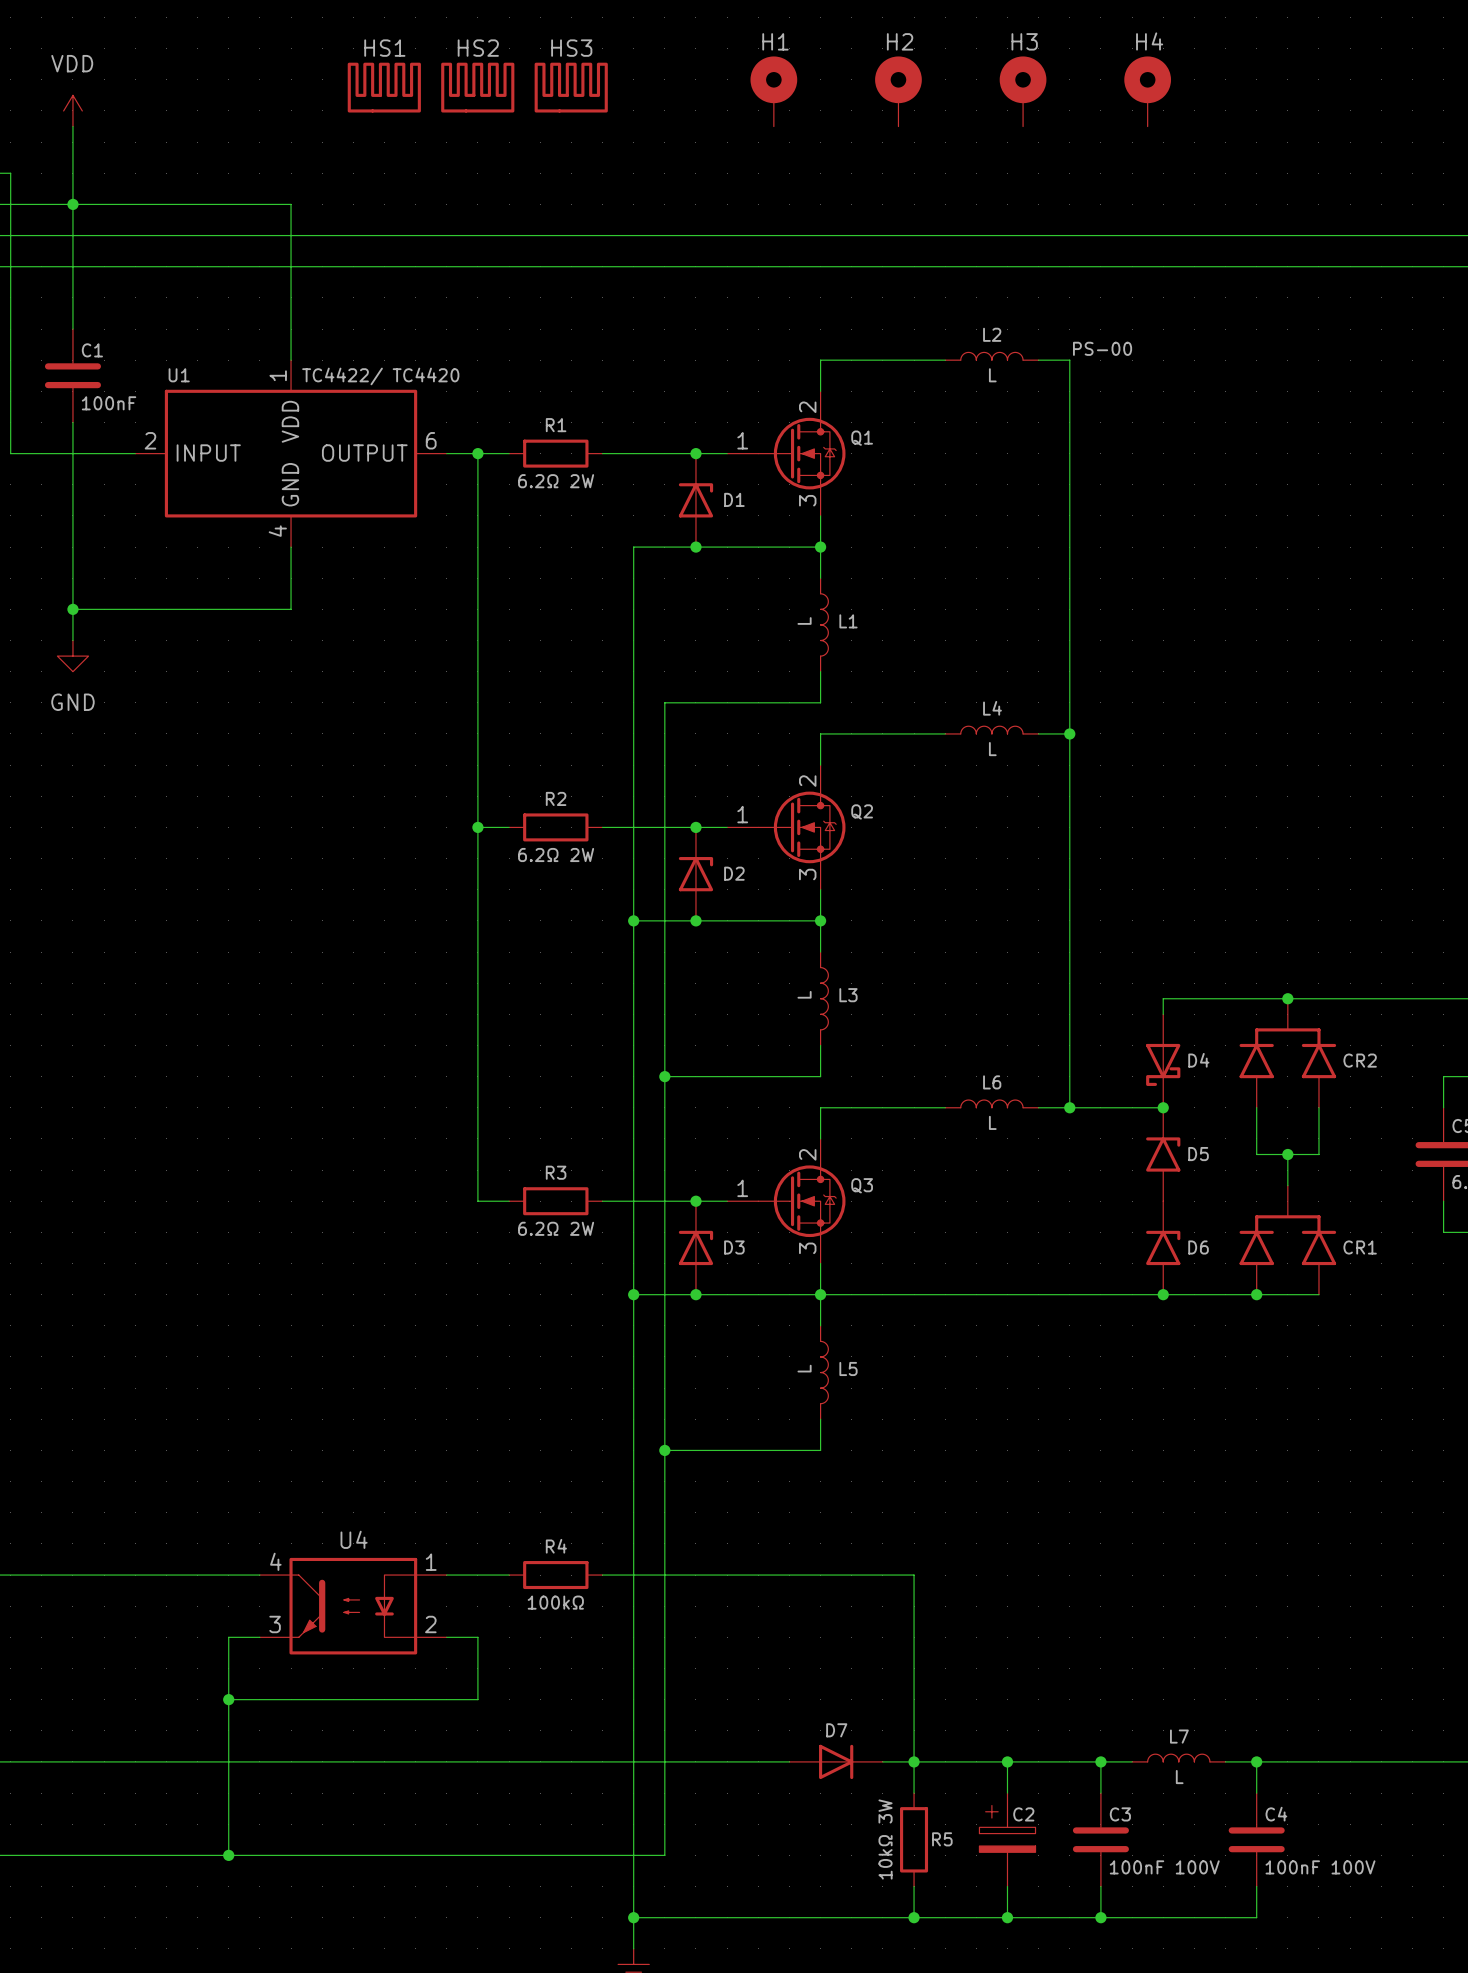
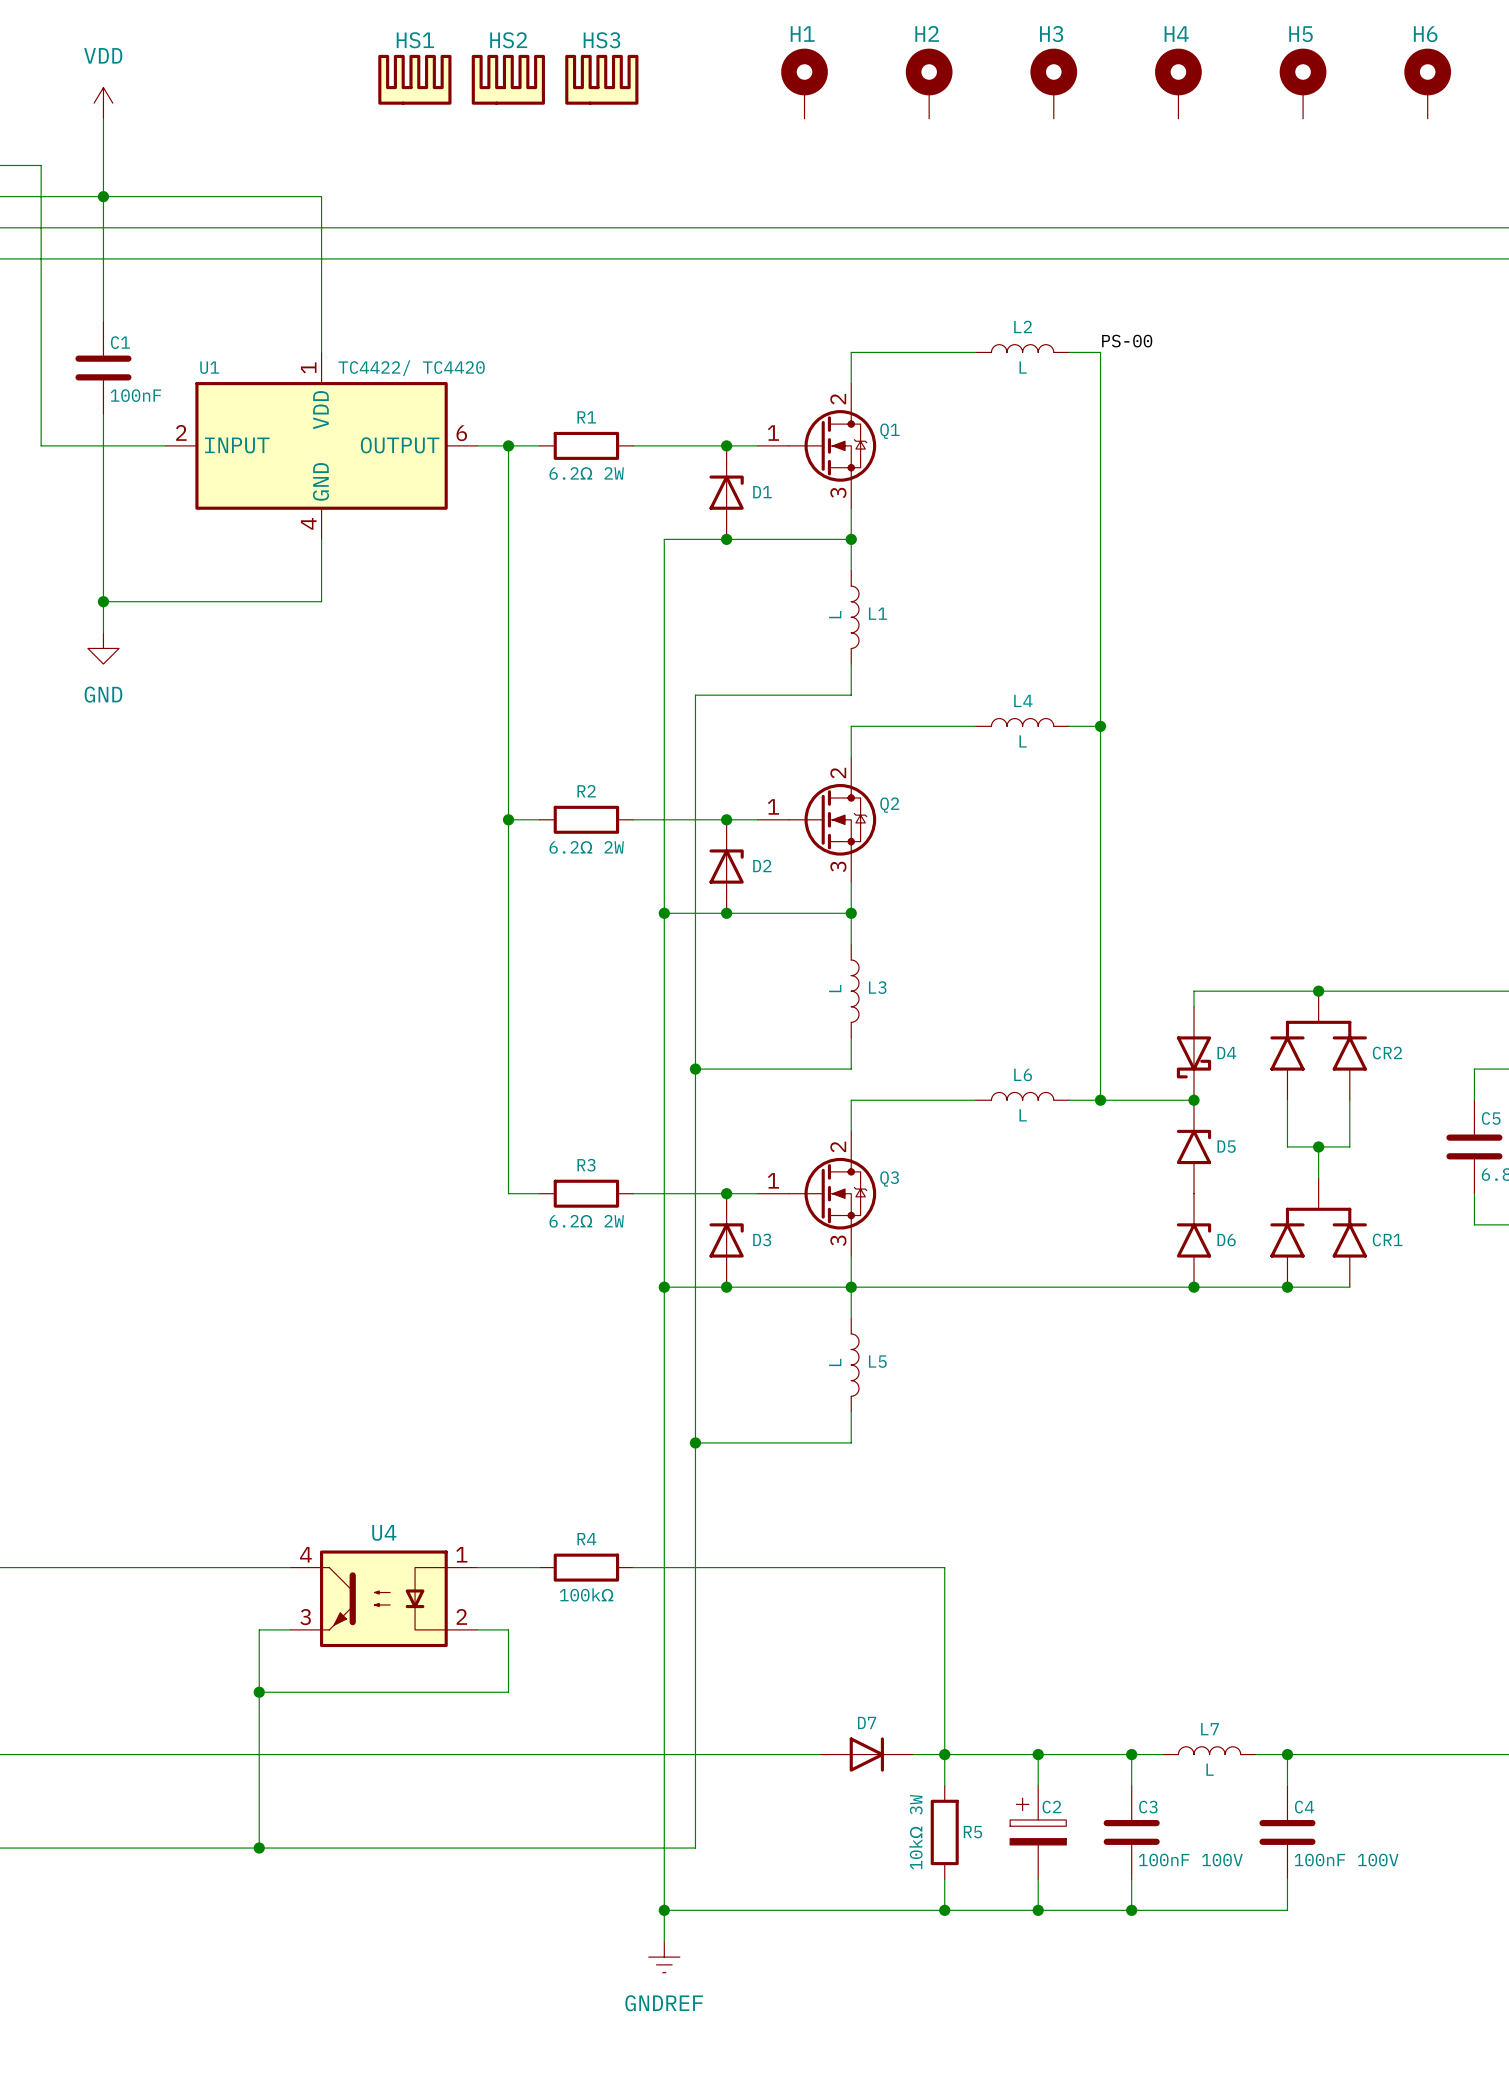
H5: none -> (1303, 83)
H6: none -> (1427, 83)

